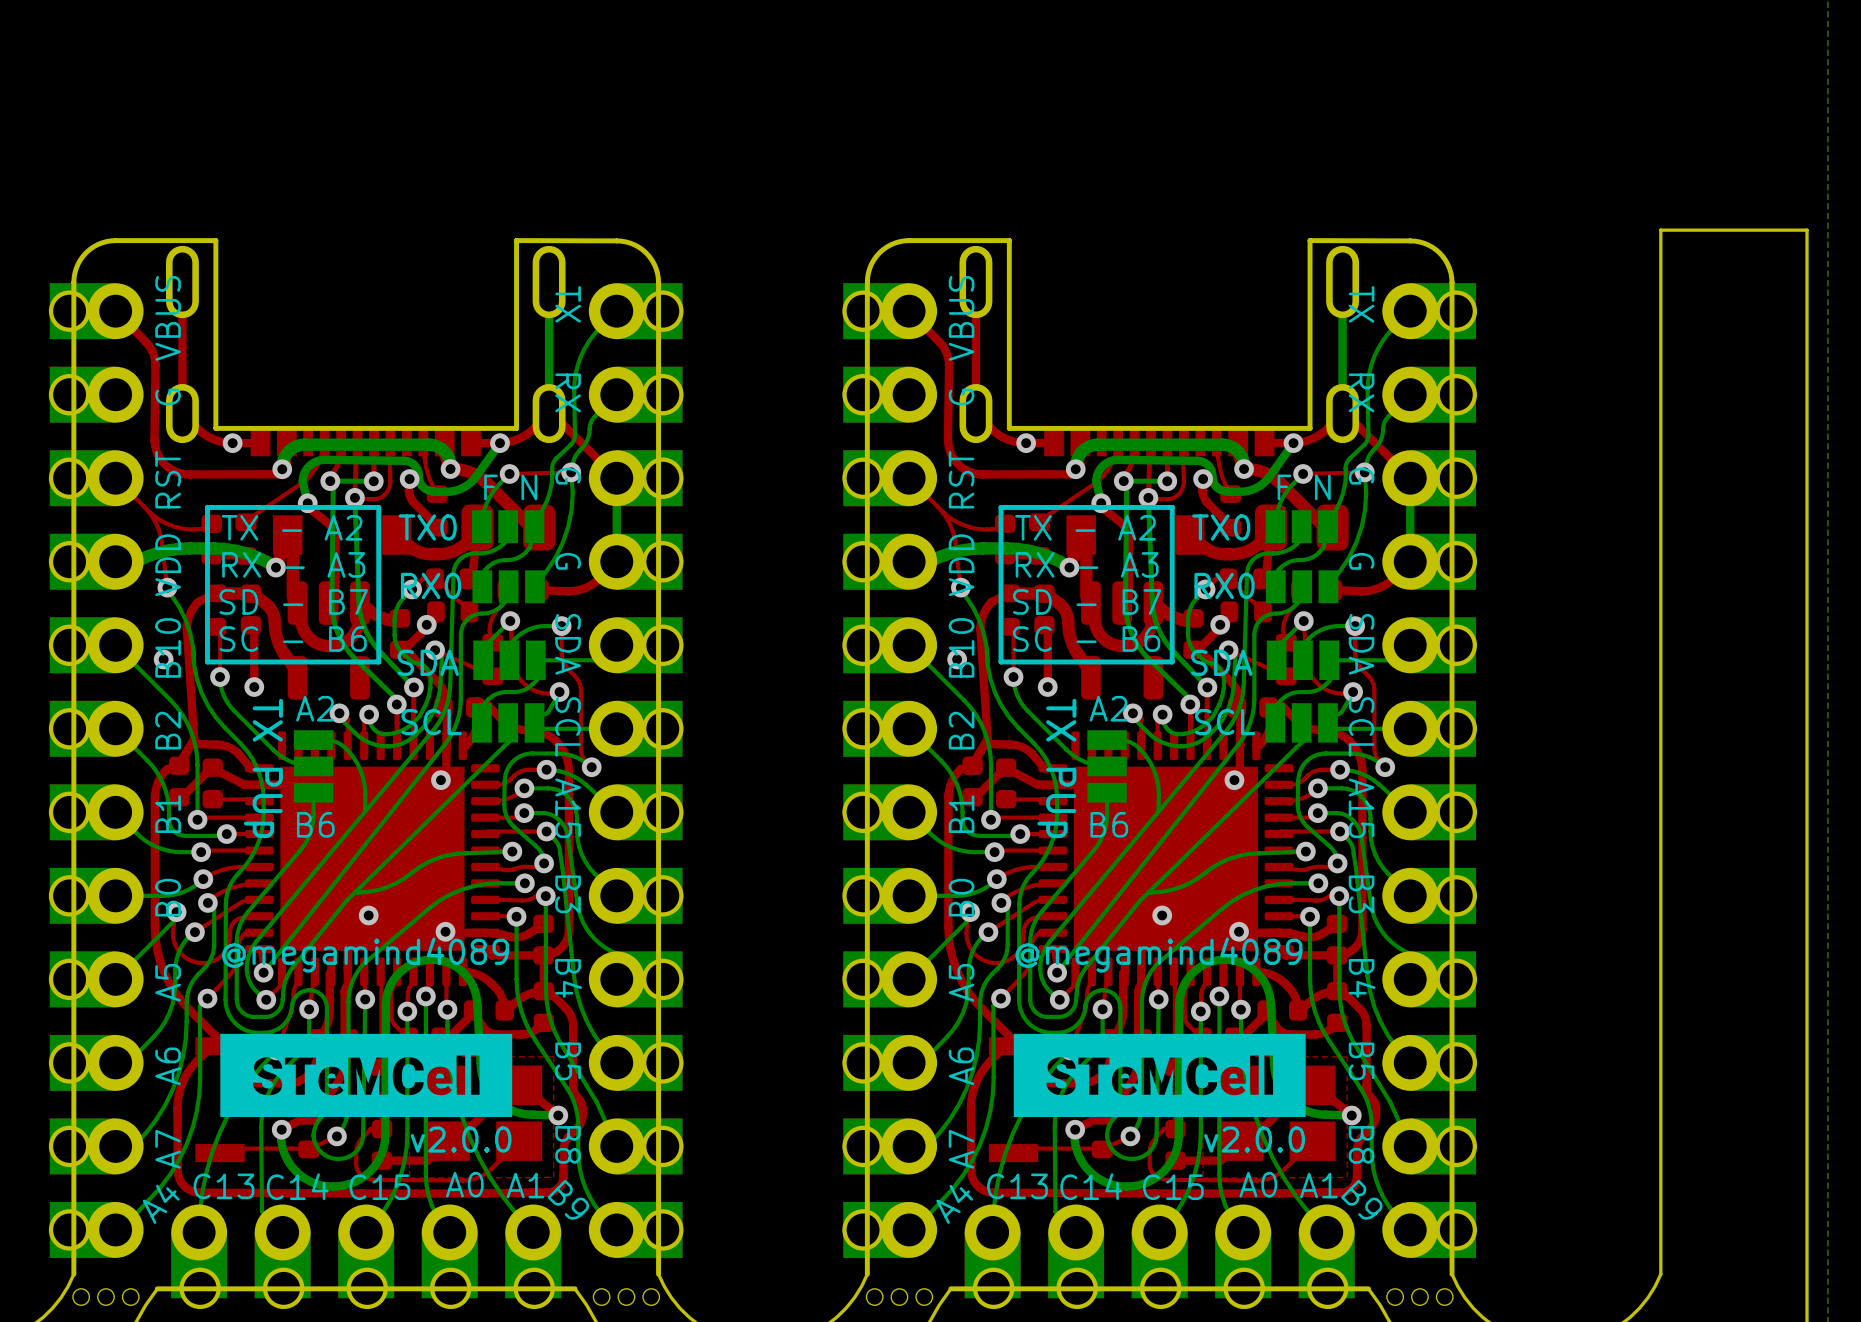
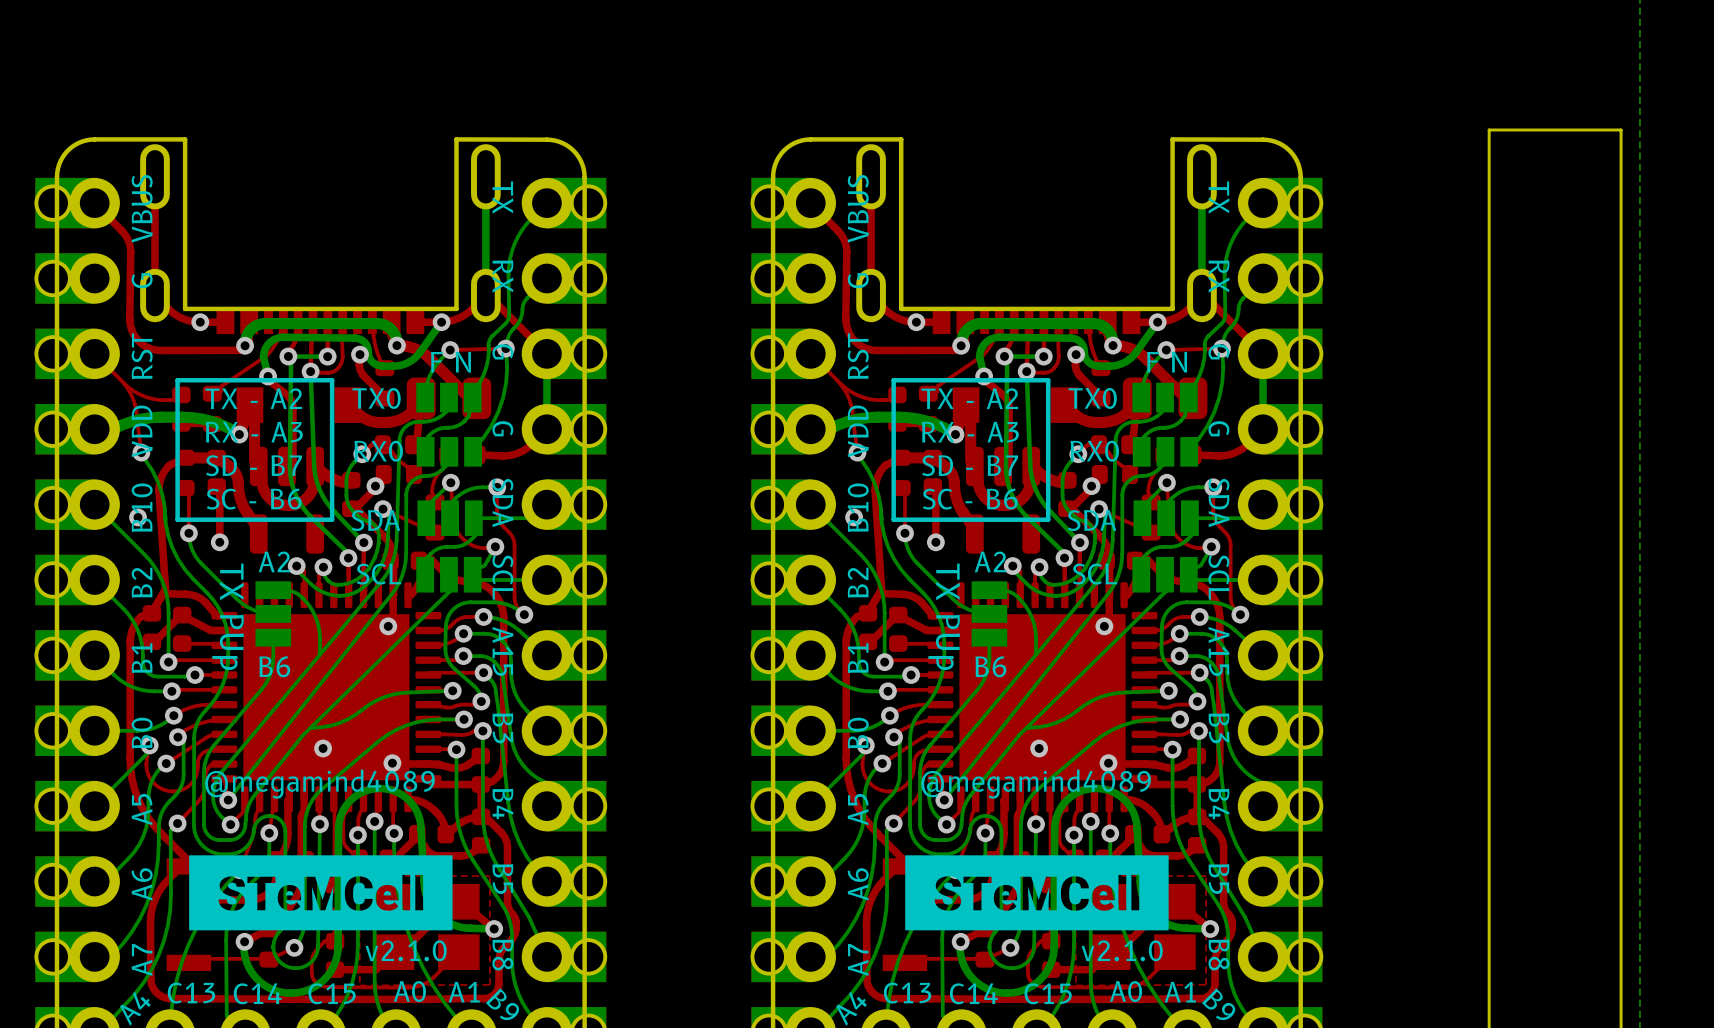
text: v2.0.0 (461, 1139) -> v2.1.0 (406, 950)
text: v2.0.0 (1254, 1139) -> v2.1.0 (1122, 950)

